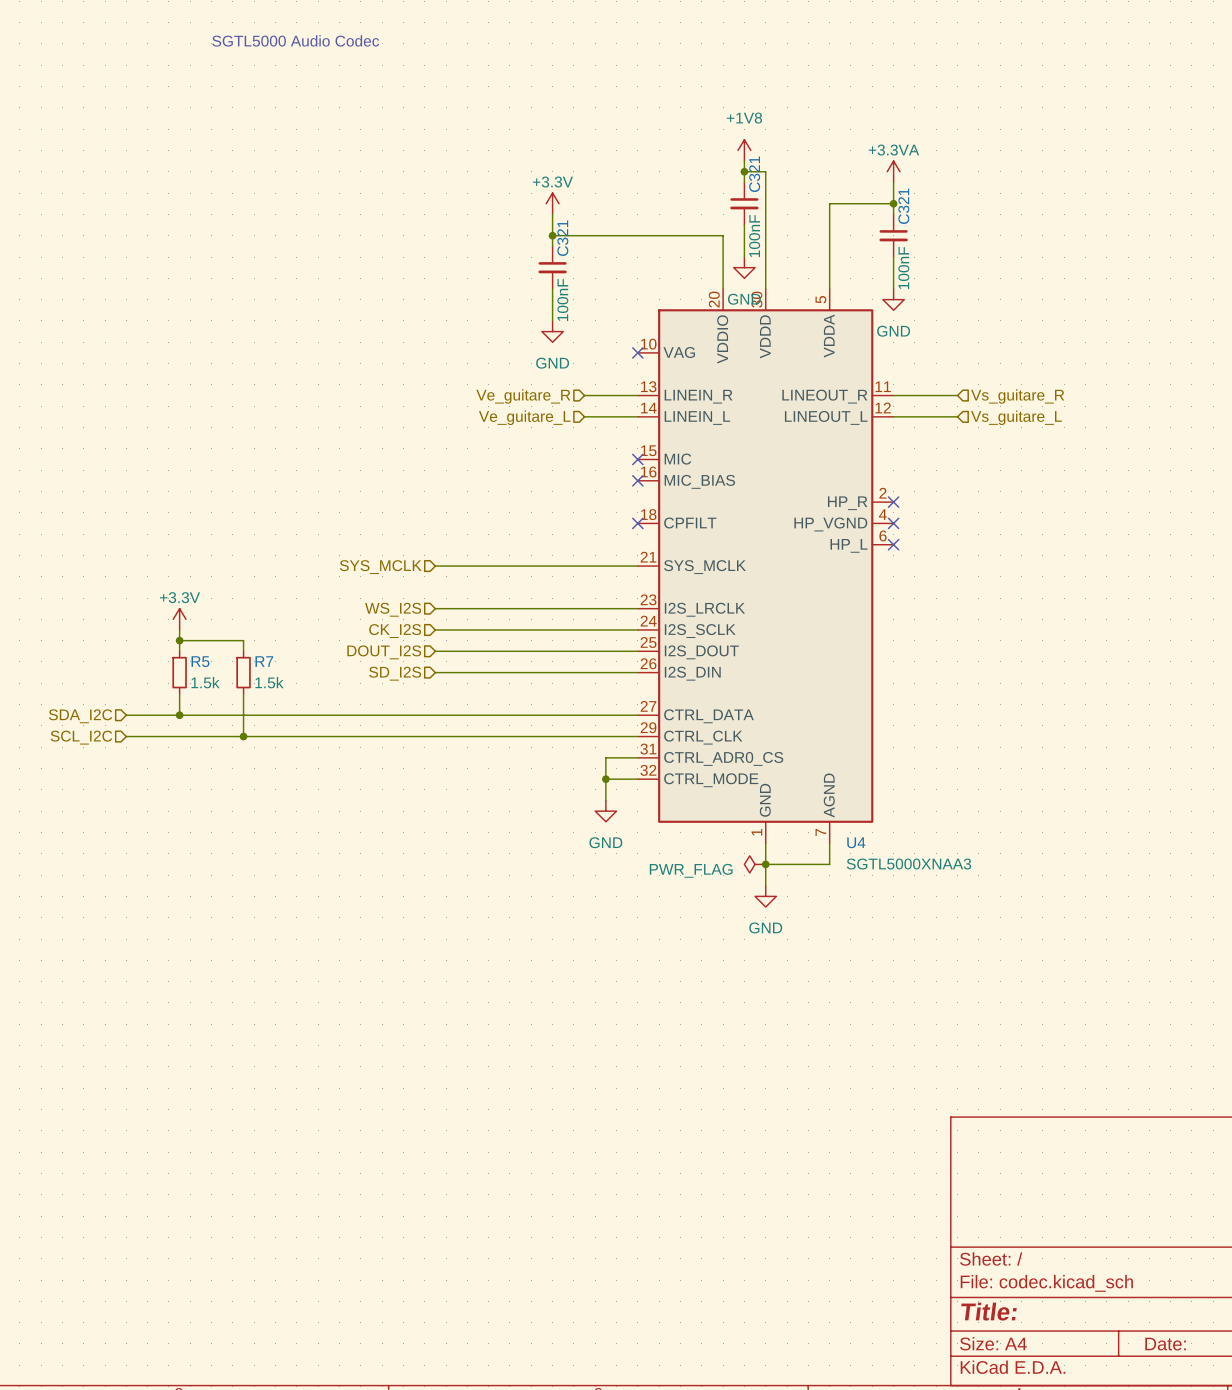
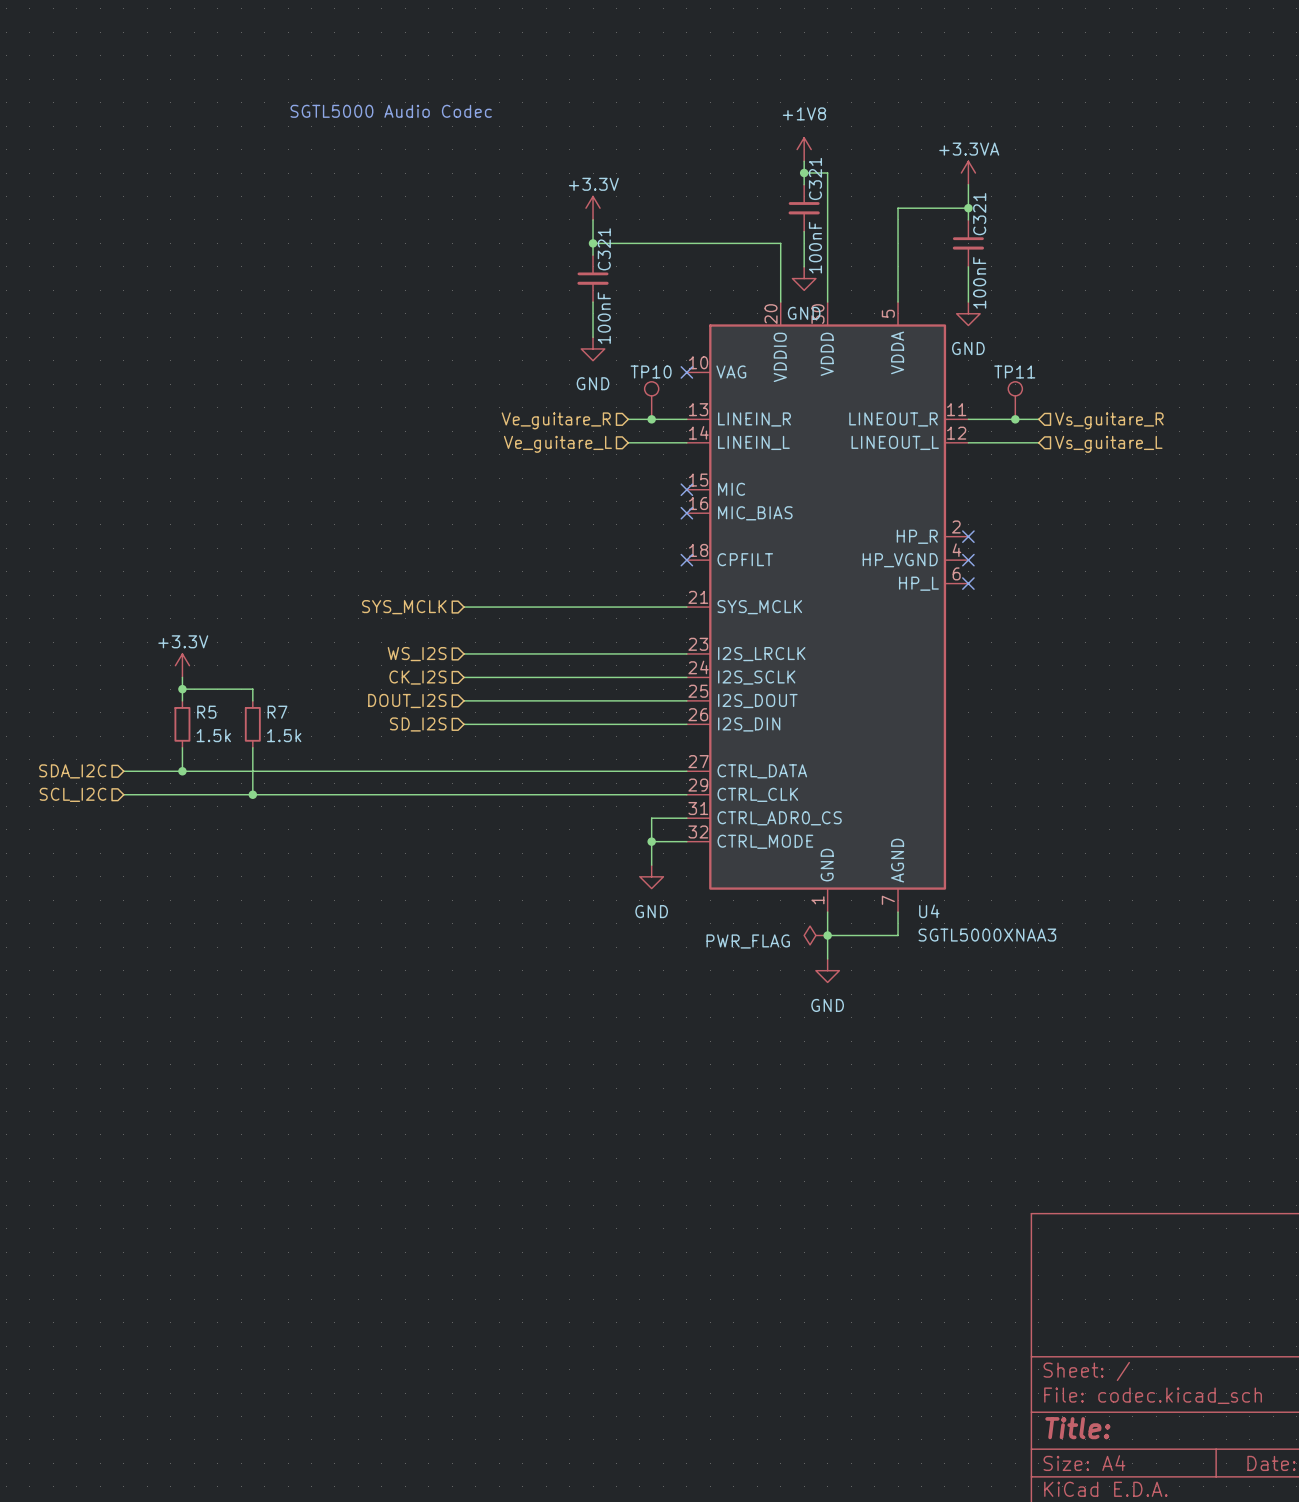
text position: SGTL5000 Audio Codec (295, 40) -> SGTL5000 Audio Codec (391, 111)
TP10: none -> (651, 400)
TP11: none -> (1015, 400)
junction: none -> (651, 419)
junction: none -> (1015, 419)

